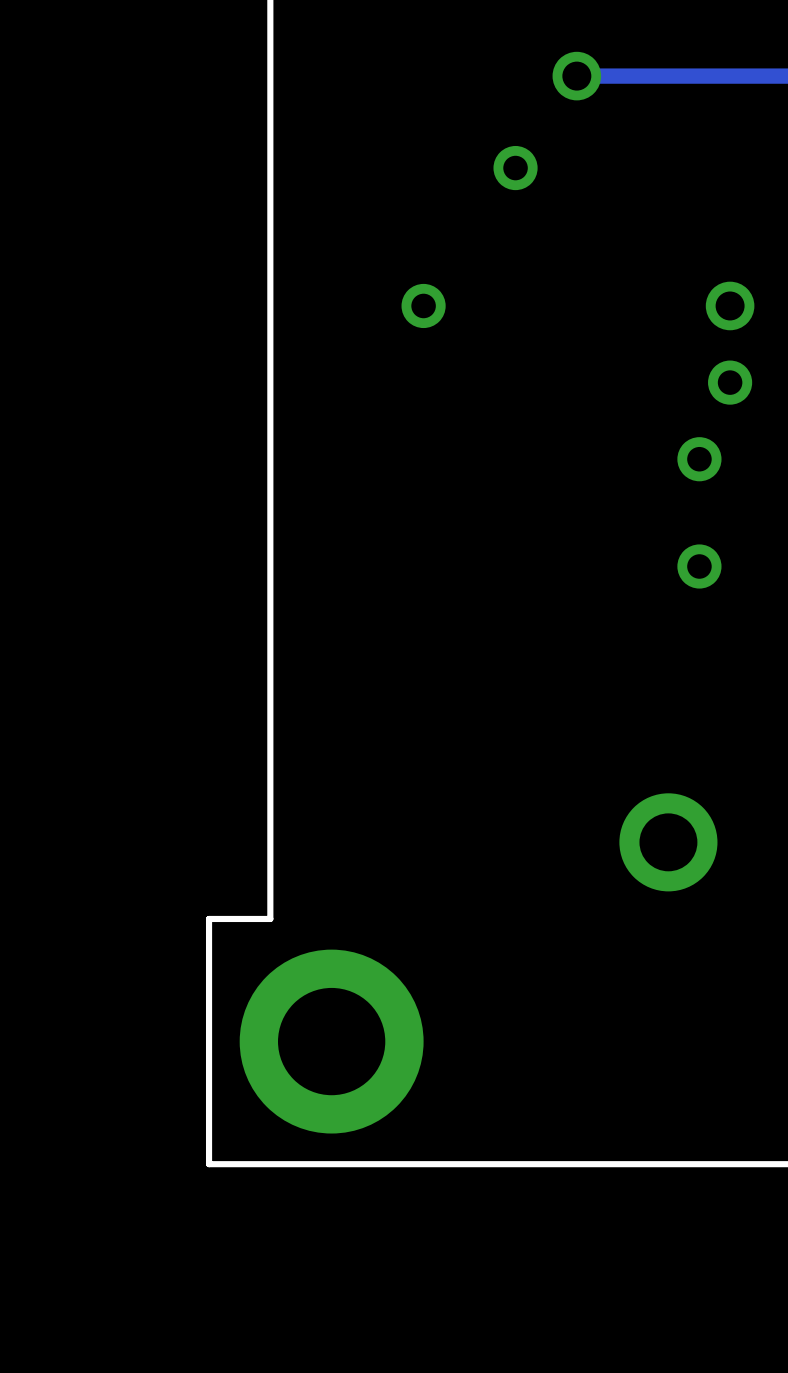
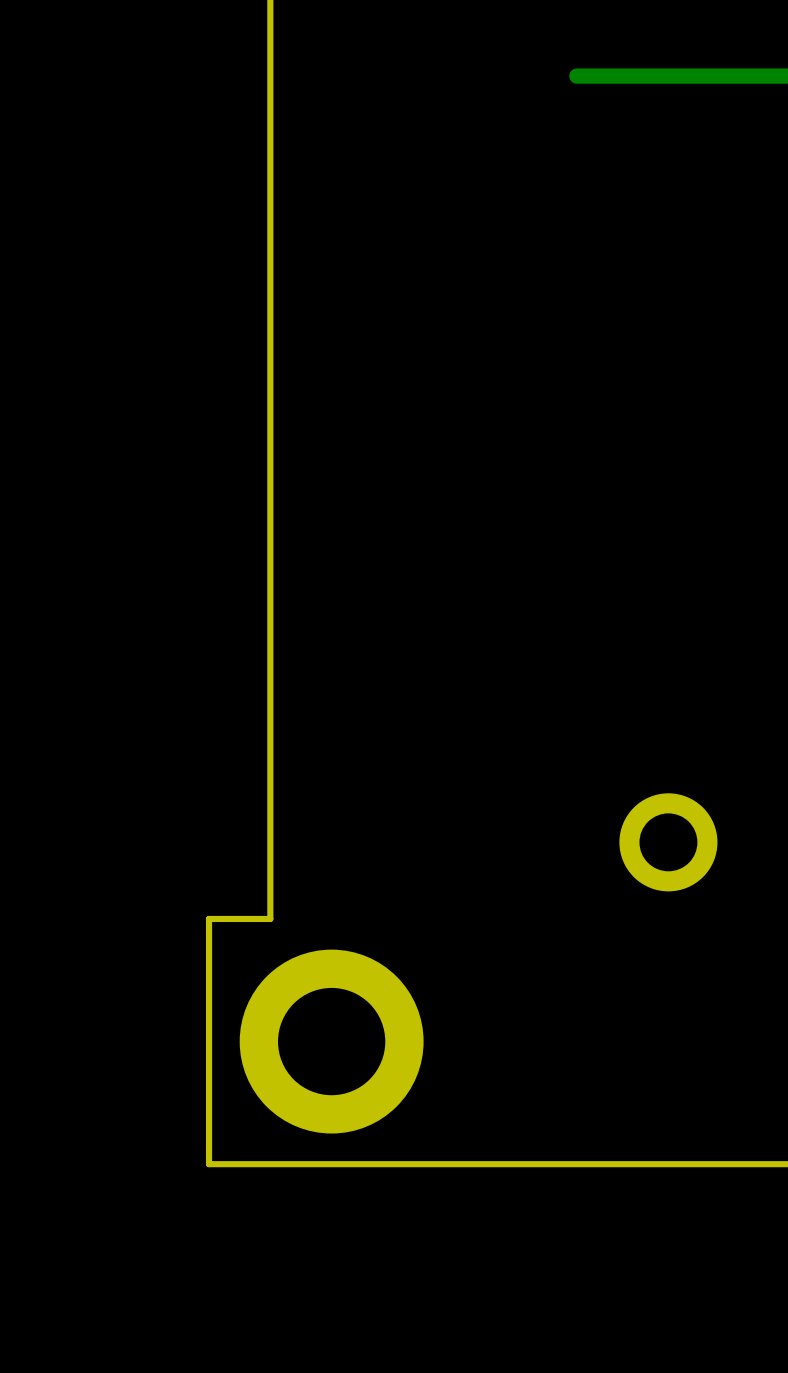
via: (576, 76) -> none
via: (515, 168) -> none
via: (423, 305) -> none
via: (730, 305) -> none
via: (730, 382) -> none
via: (699, 459) -> none
via: (699, 566) -> none

